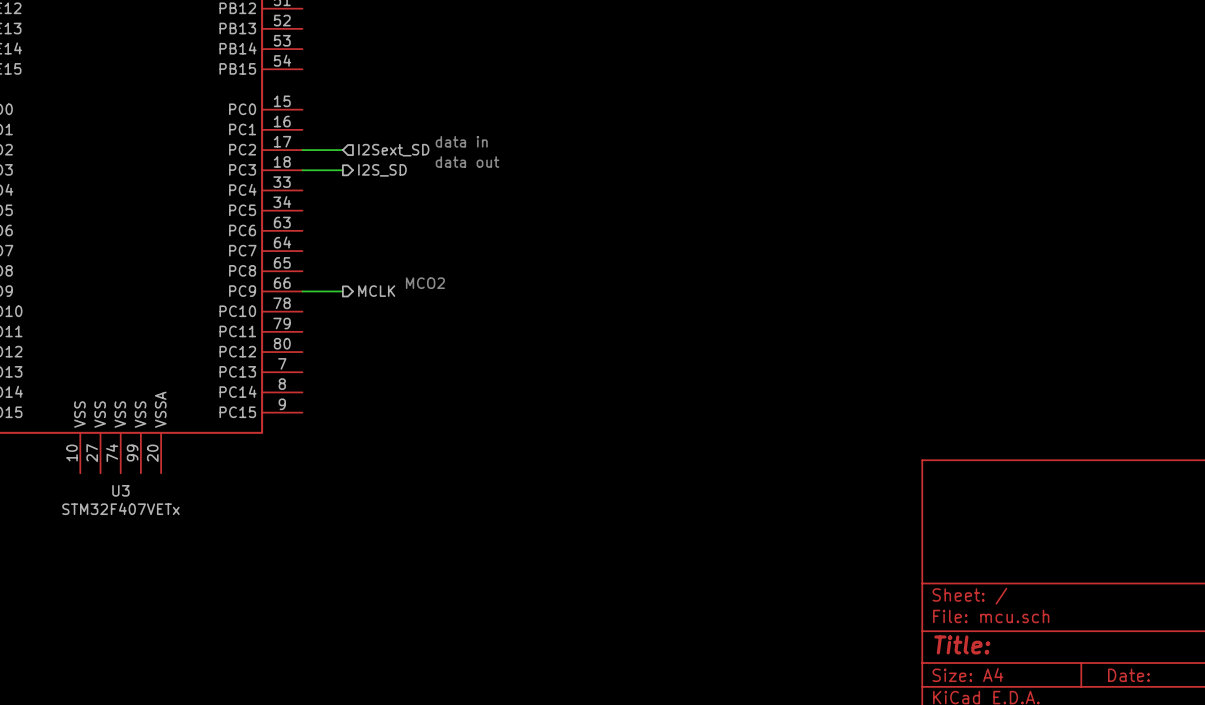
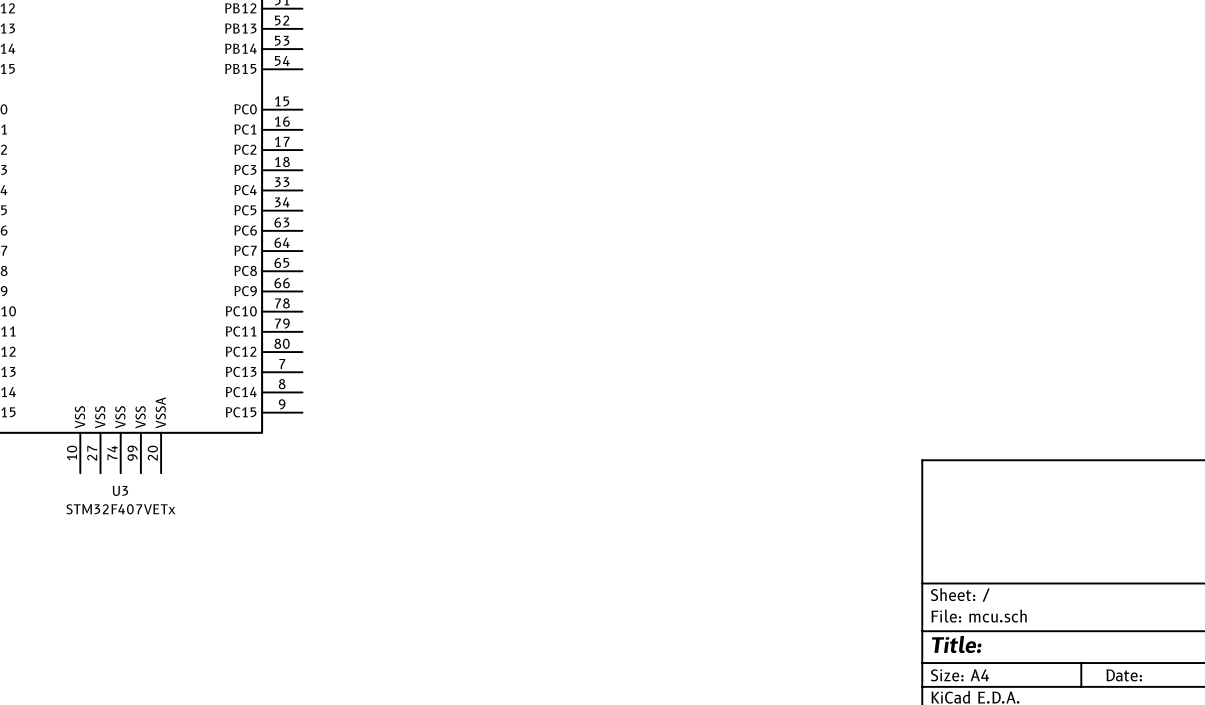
text: data in (461, 141) -> none
wire: (302, 150) (342, 150) -> none
hierarchical label: I2Sext_SD (393, 150) -> none
text: data out (467, 161) -> none
wire: (302, 170) (342, 170) -> none
hierarchical label: I2S_SD (382, 170) -> none
text: MCO2 (425, 283) -> none
wire: (302, 291) (342, 291) -> none
hierarchical label: MCLK (376, 291) -> none

